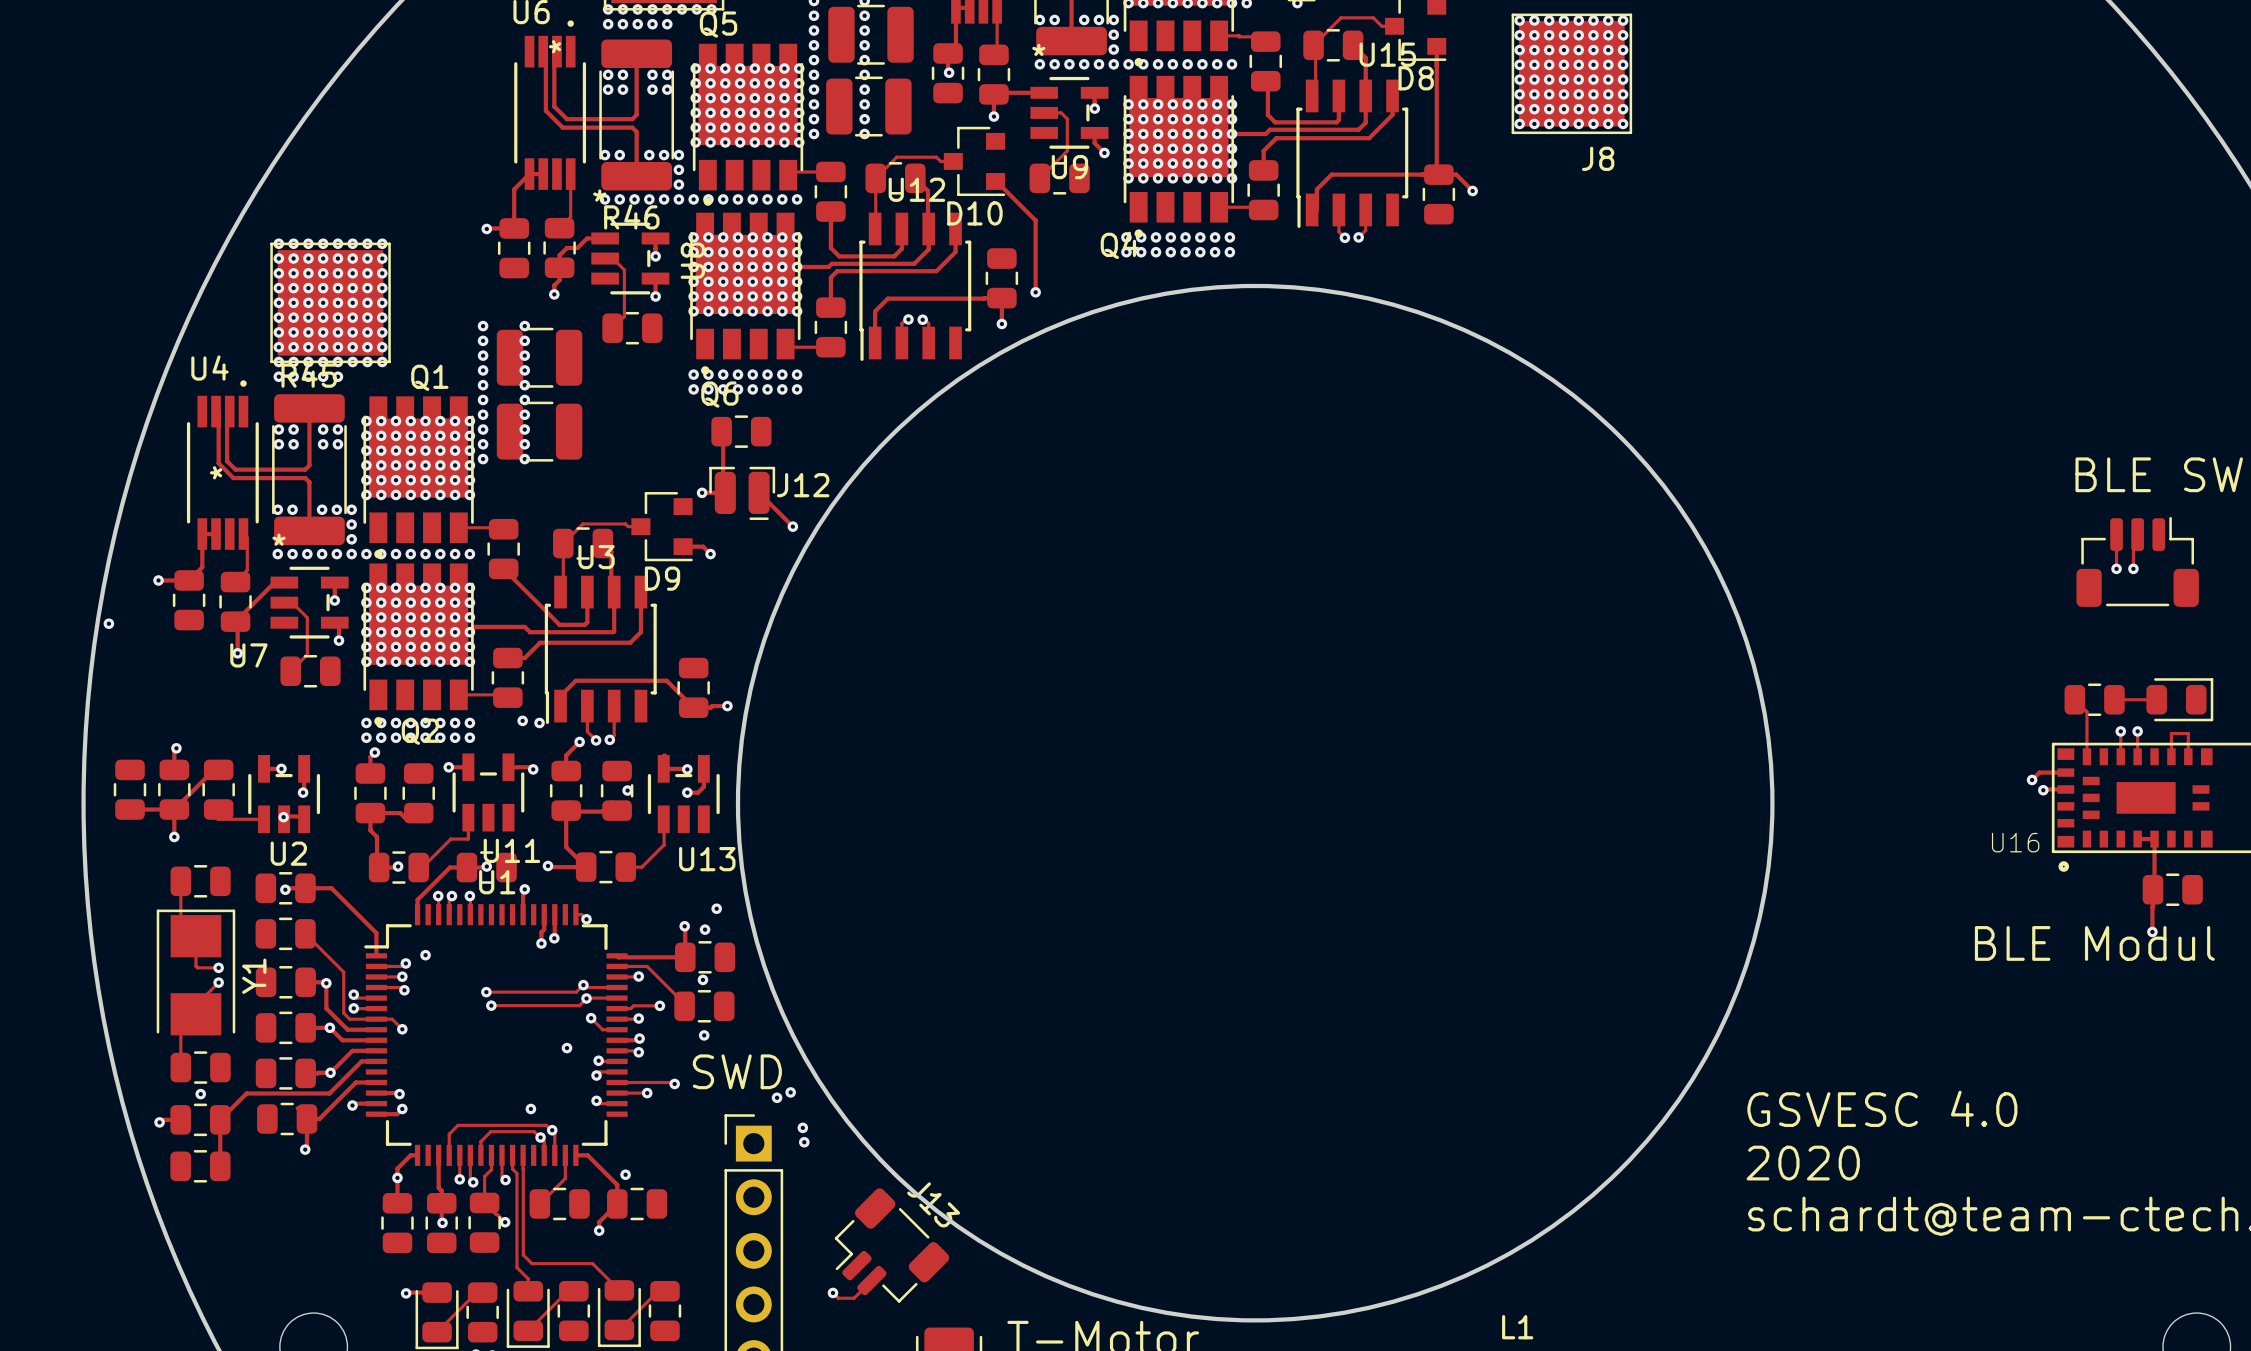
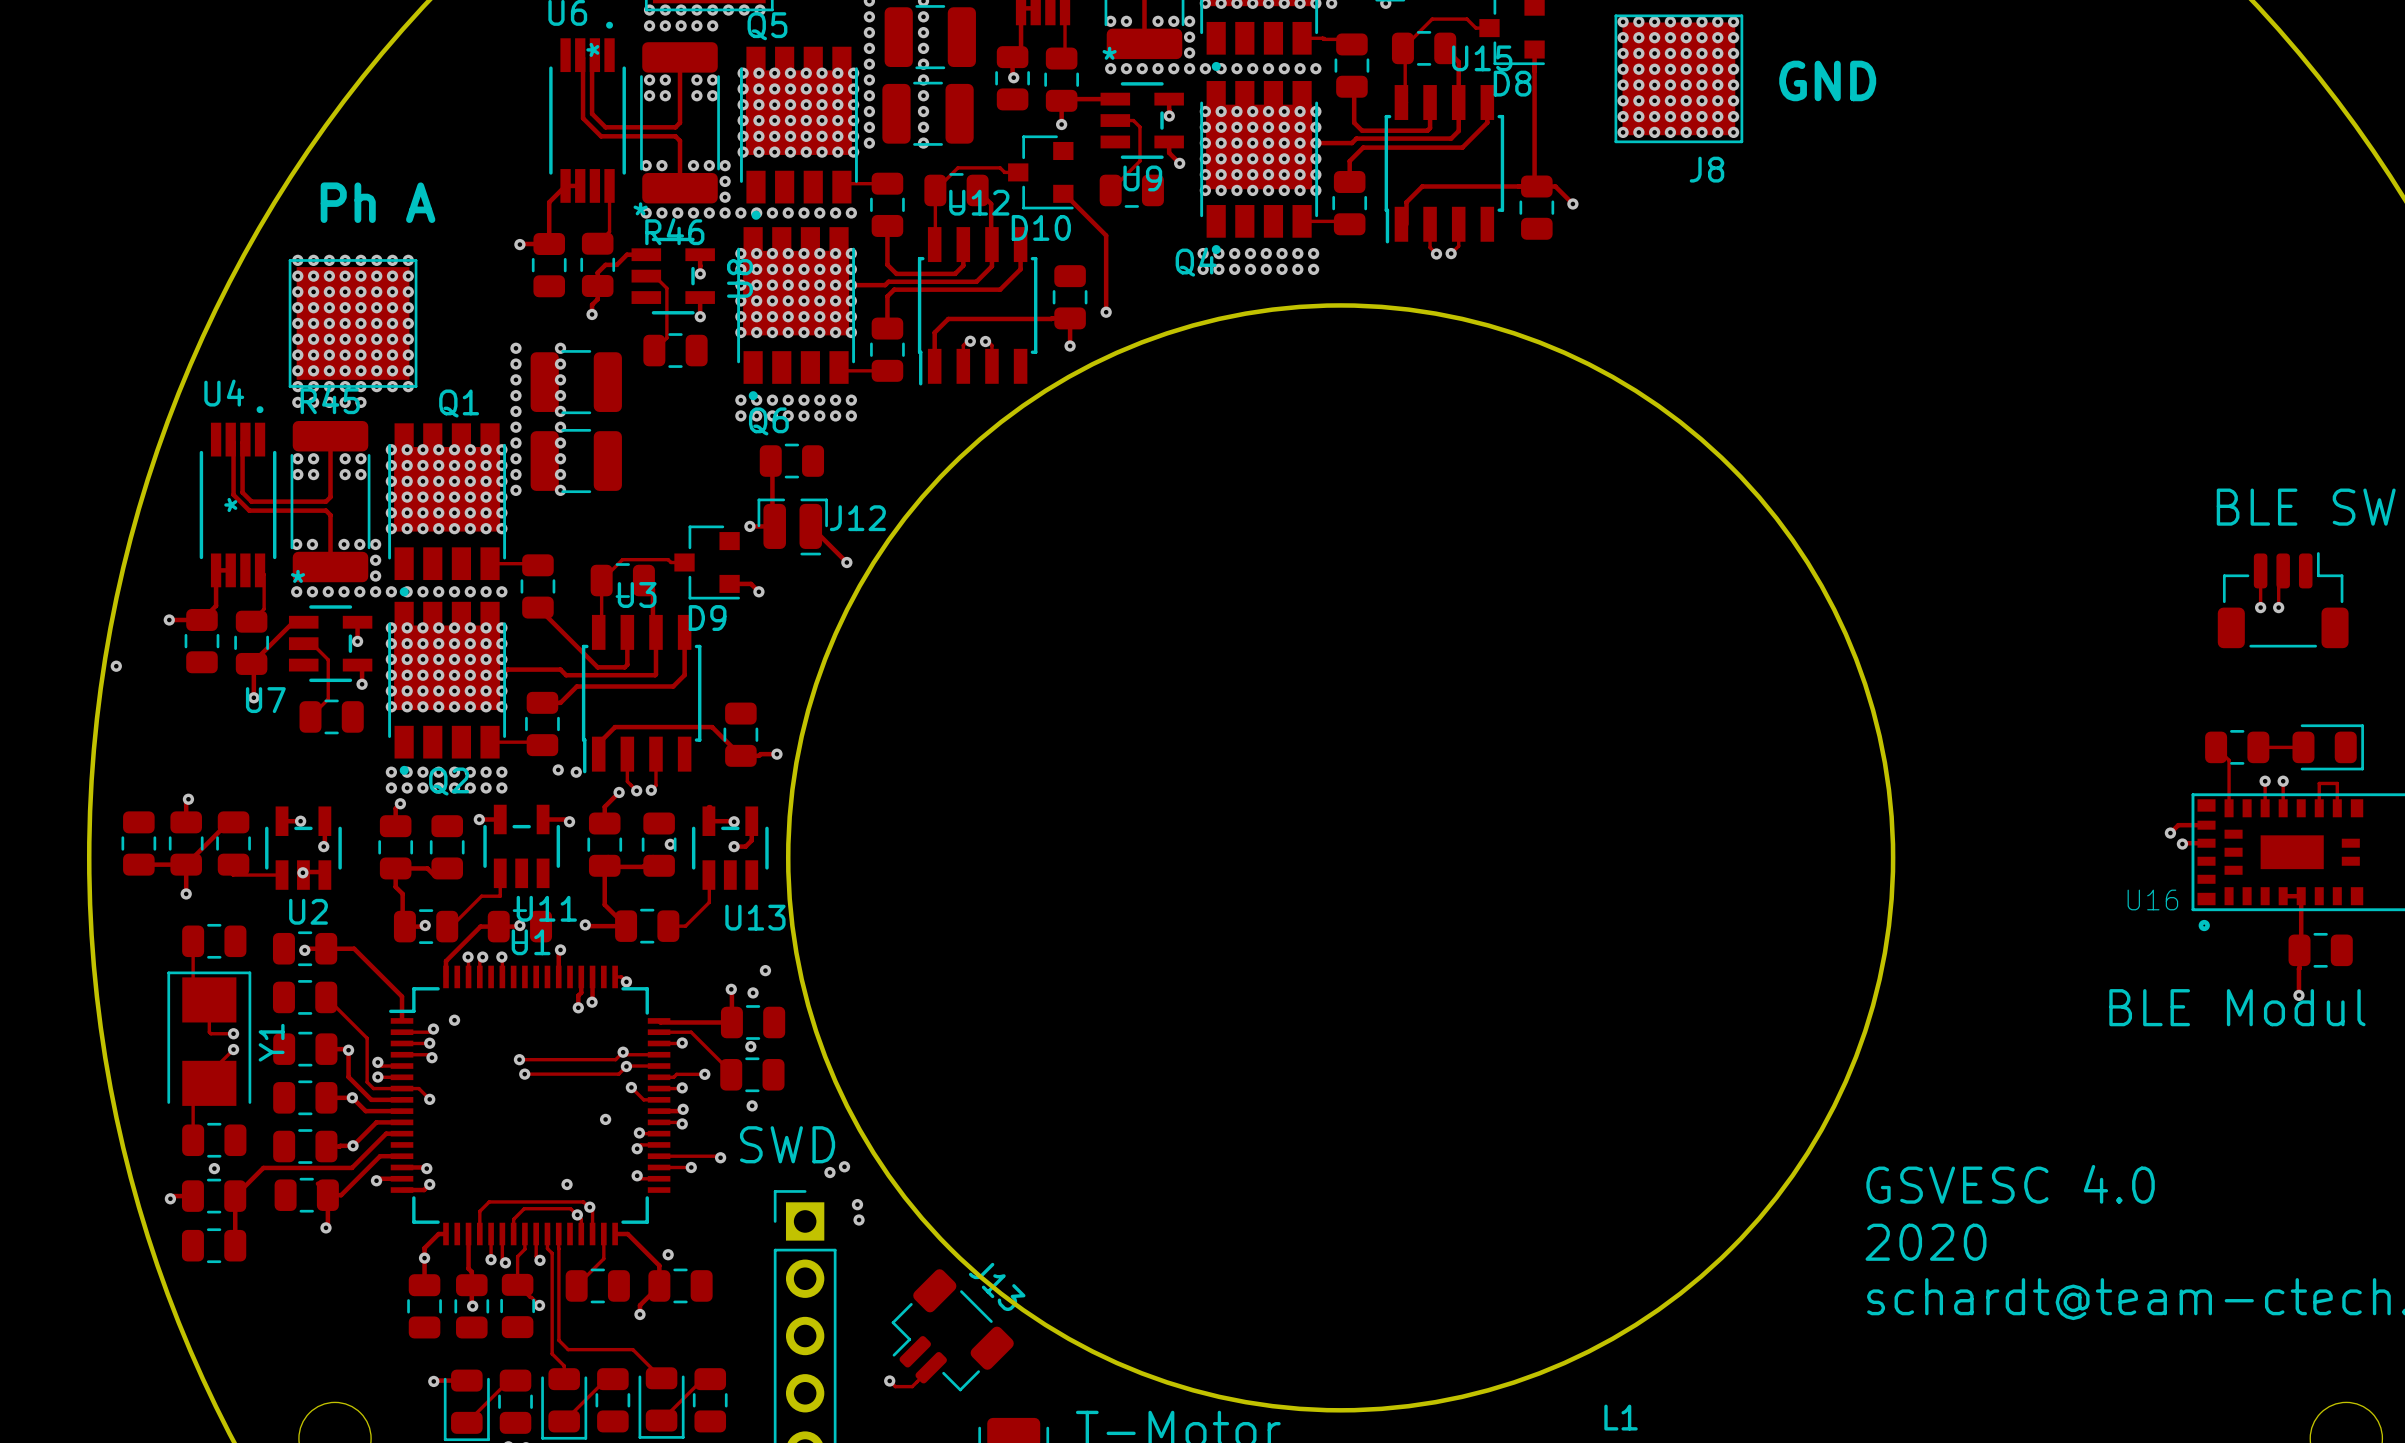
text: none -> GND (1827, 80)
text: none -> Ph A (378, 202)

